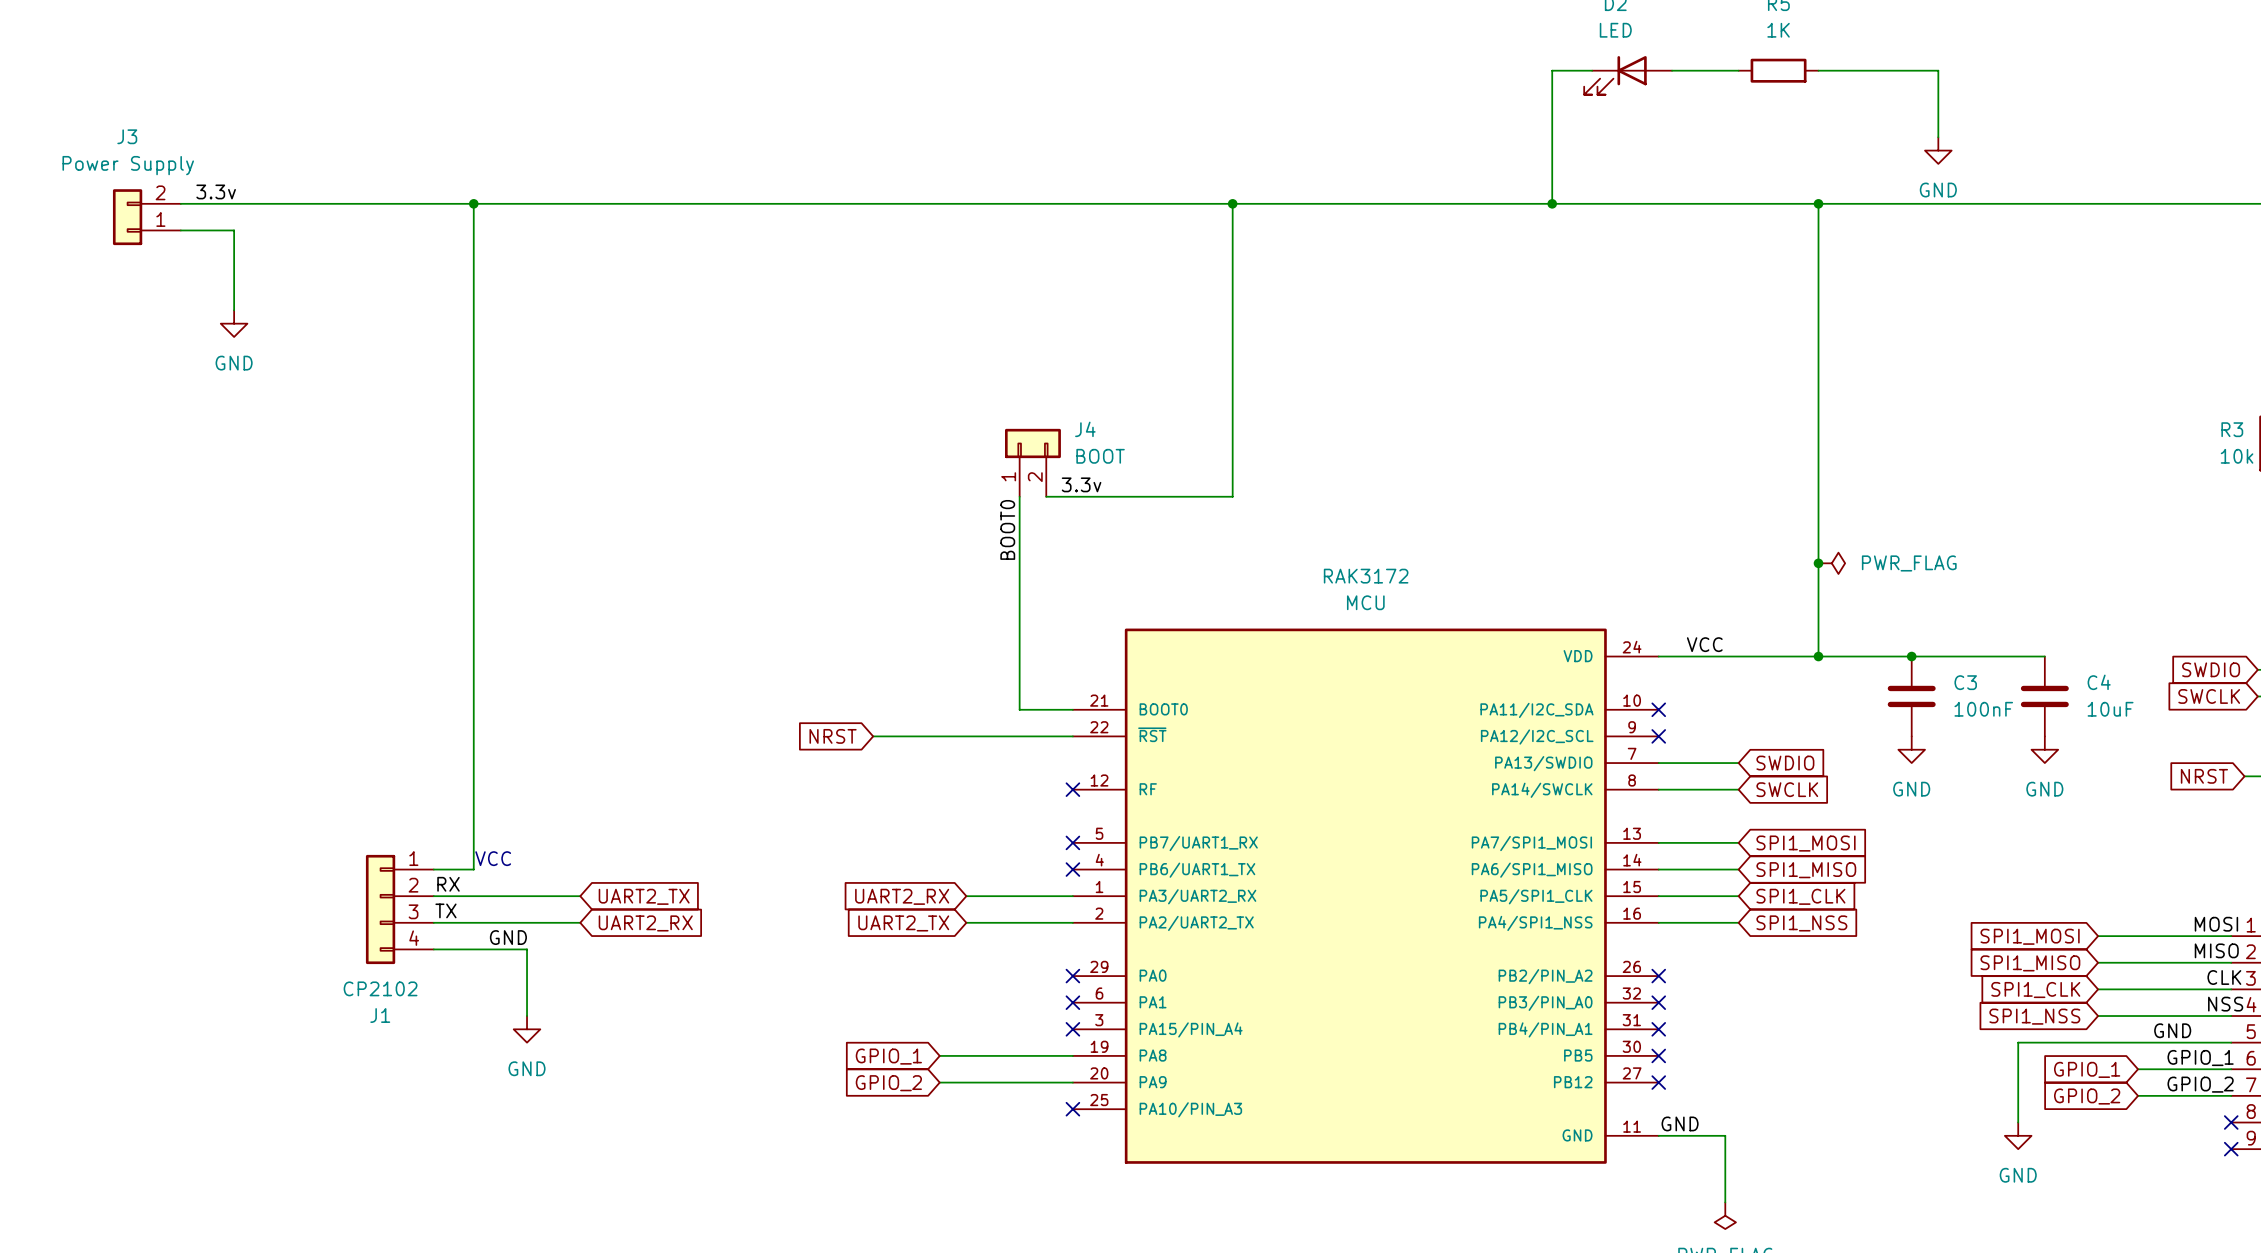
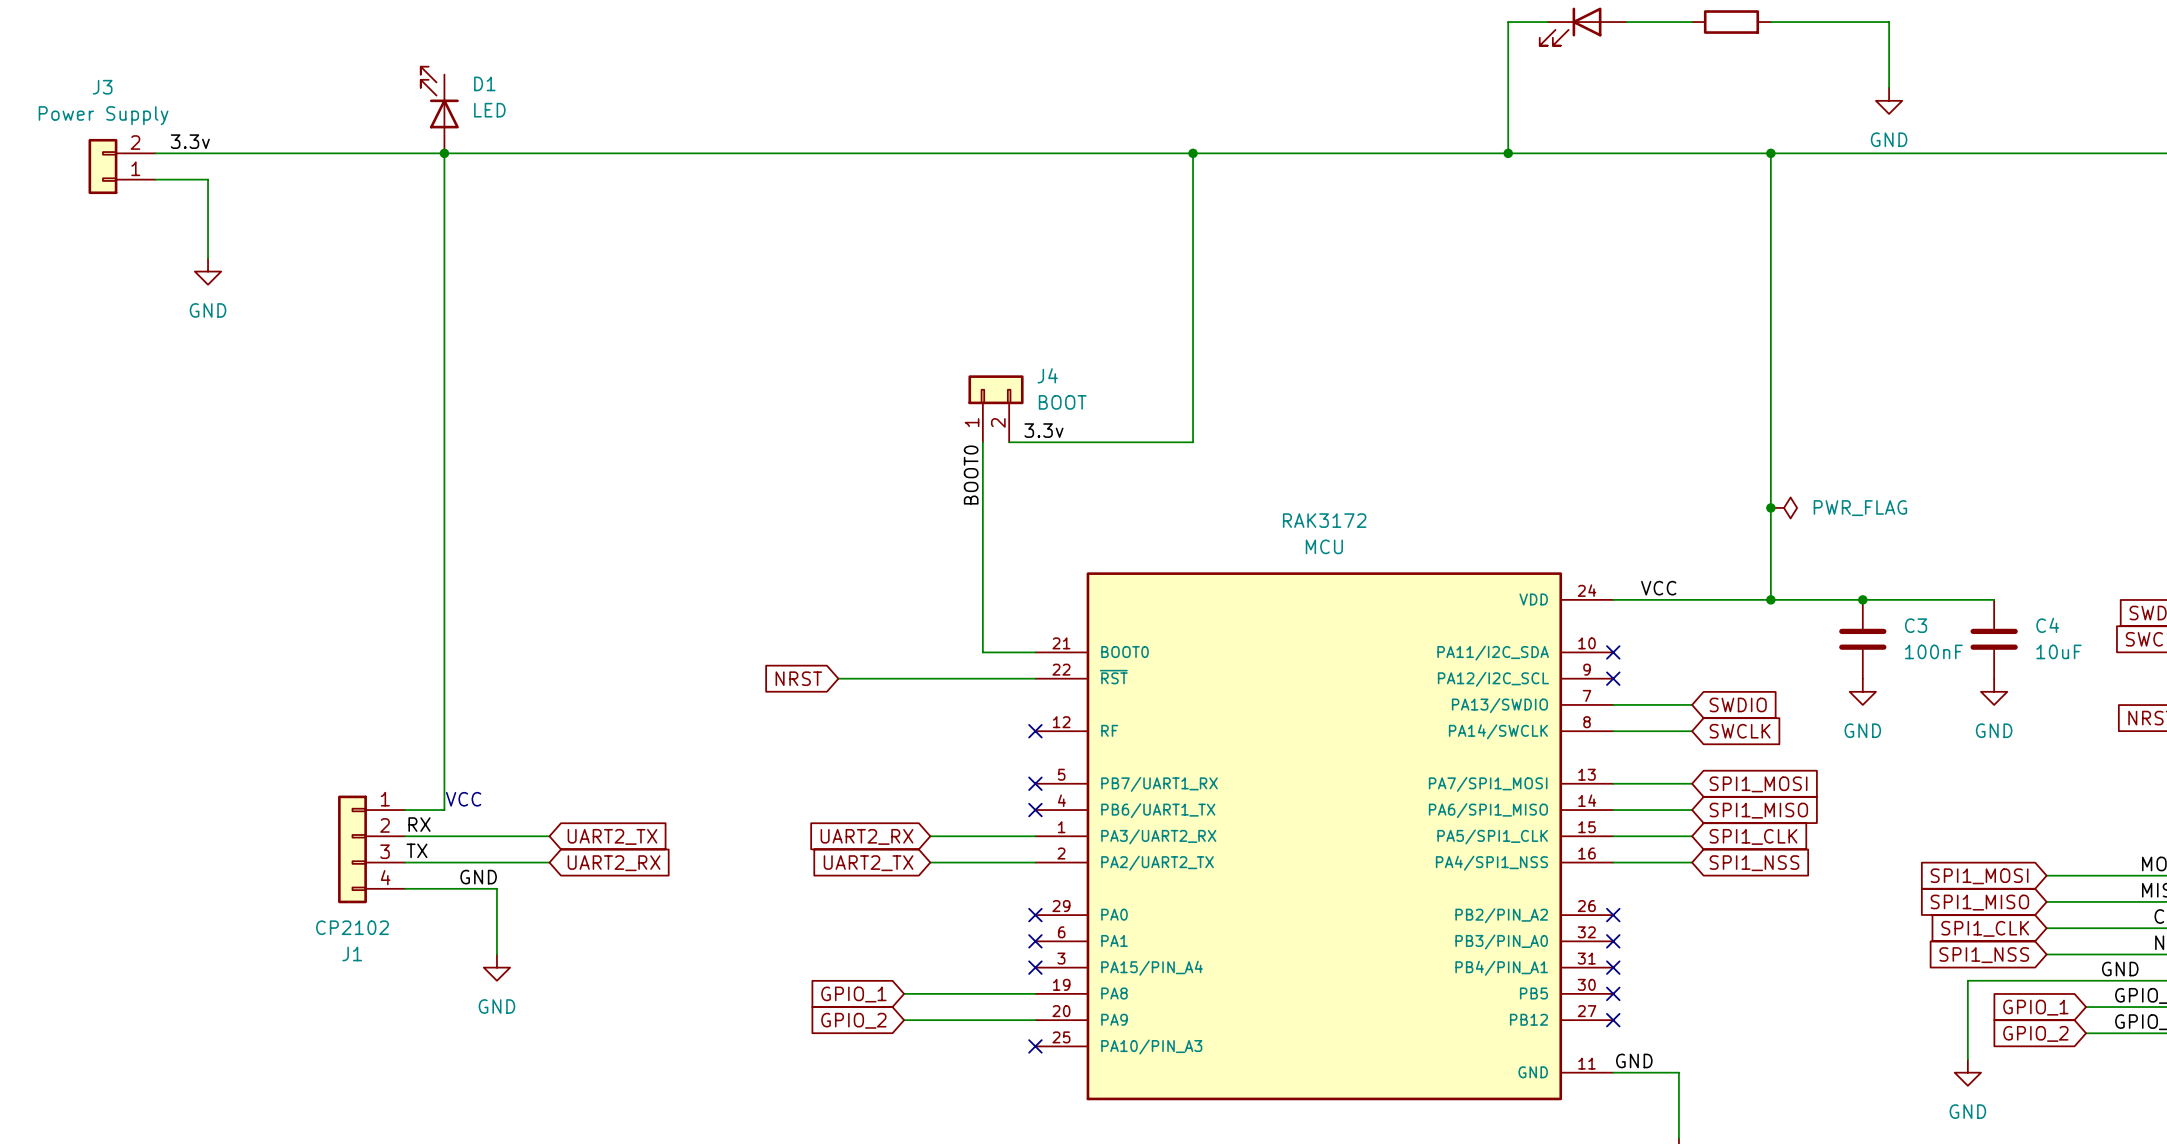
D1: none -> LED (439, 110)

